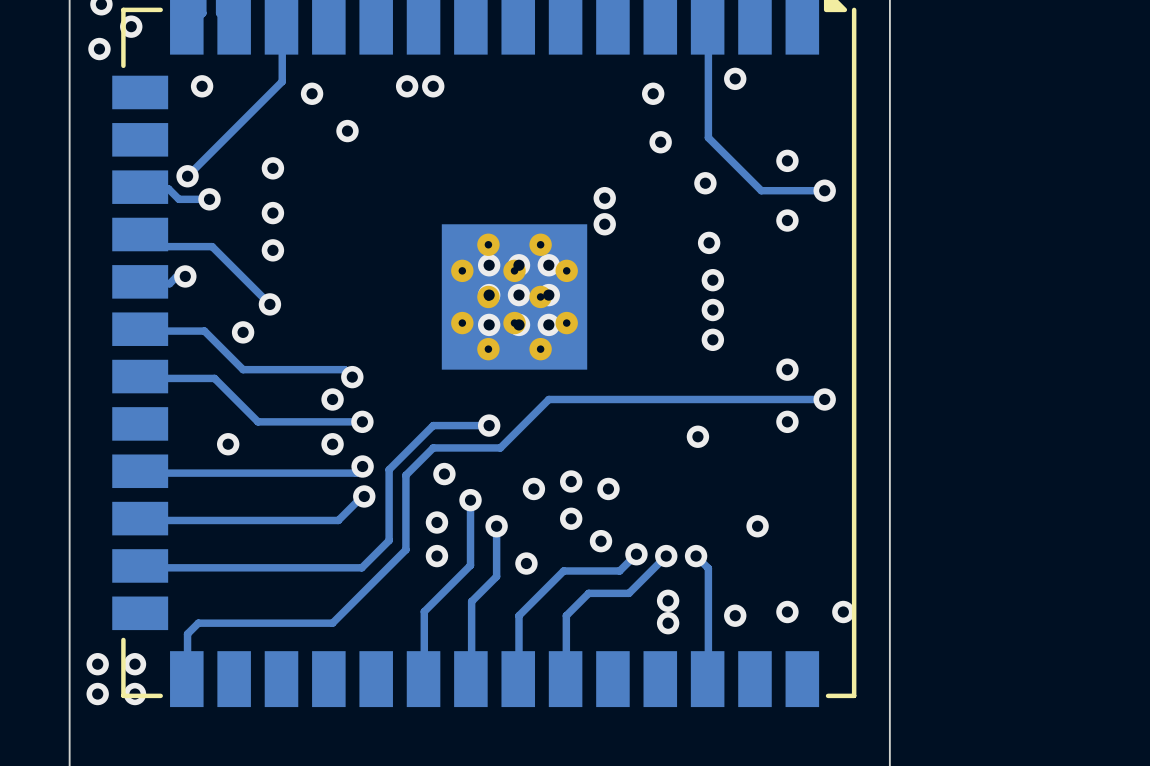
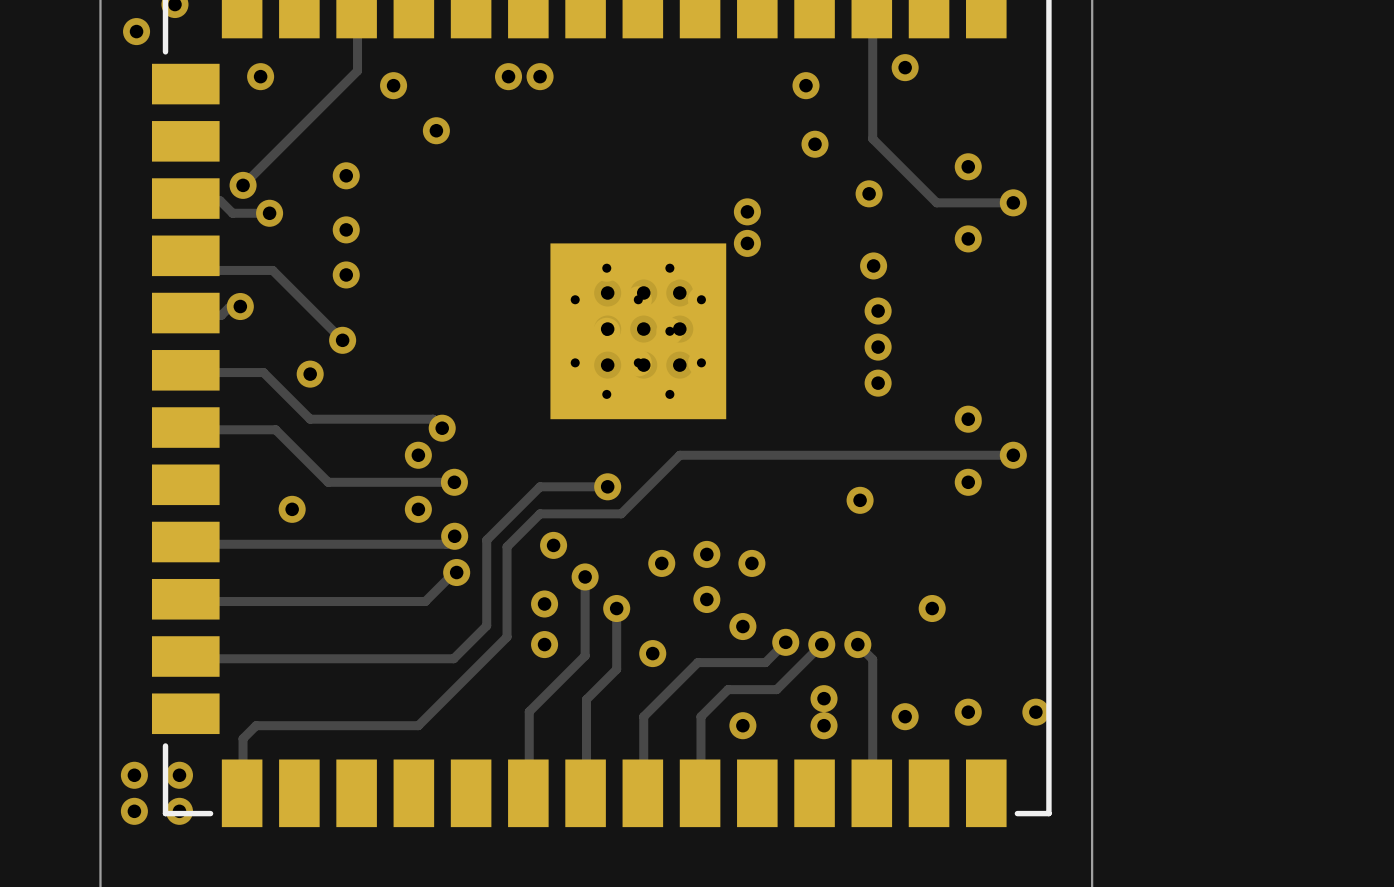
via: none -> (742, 725)

